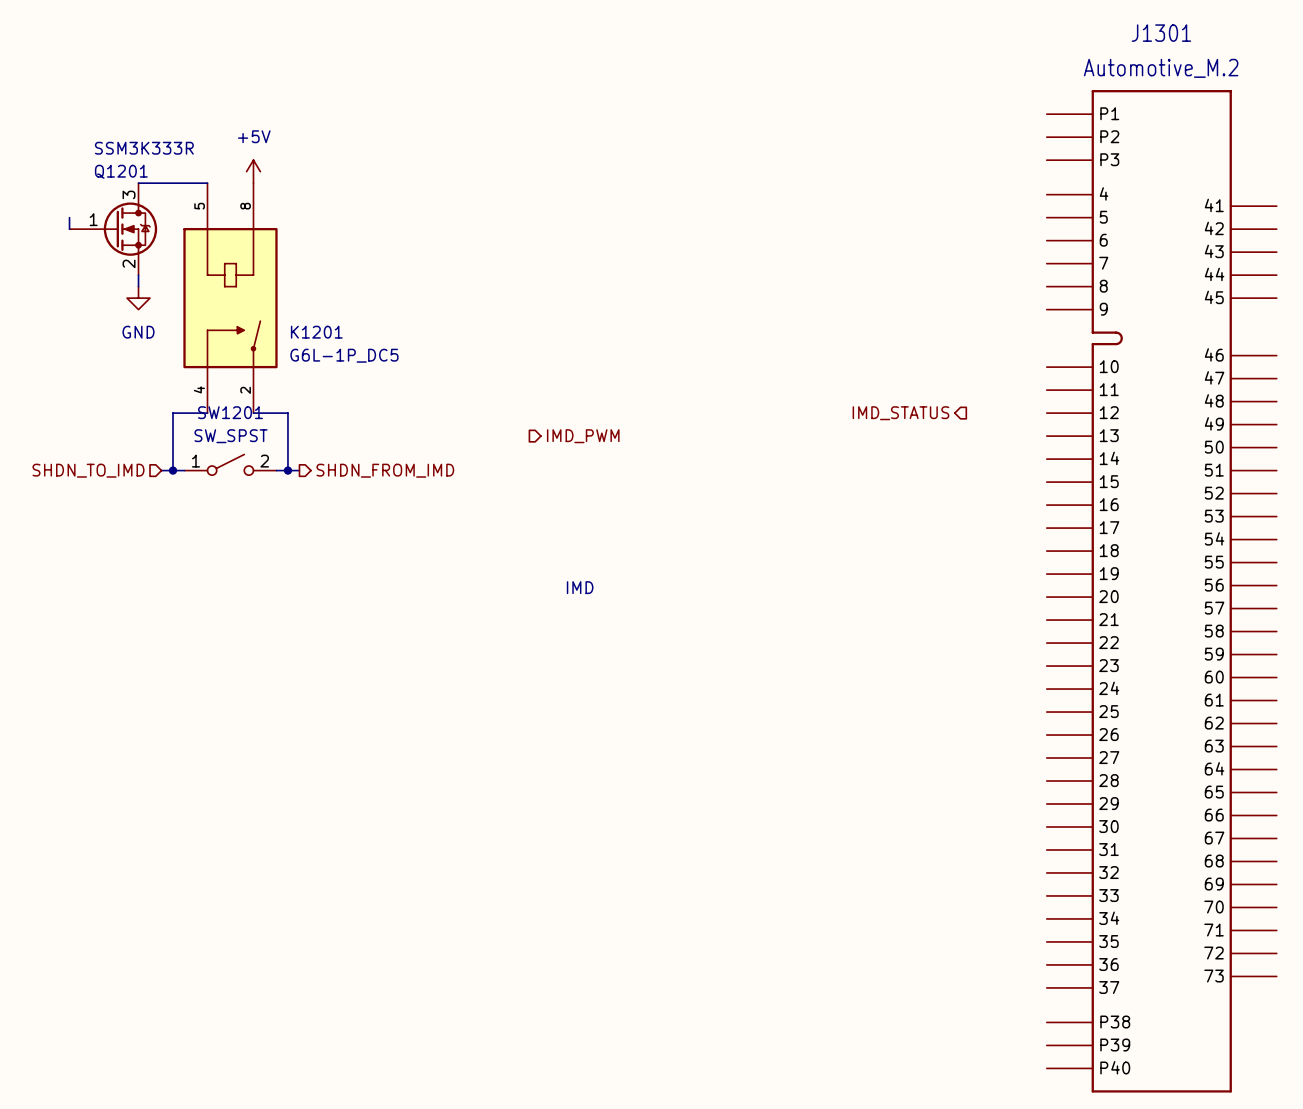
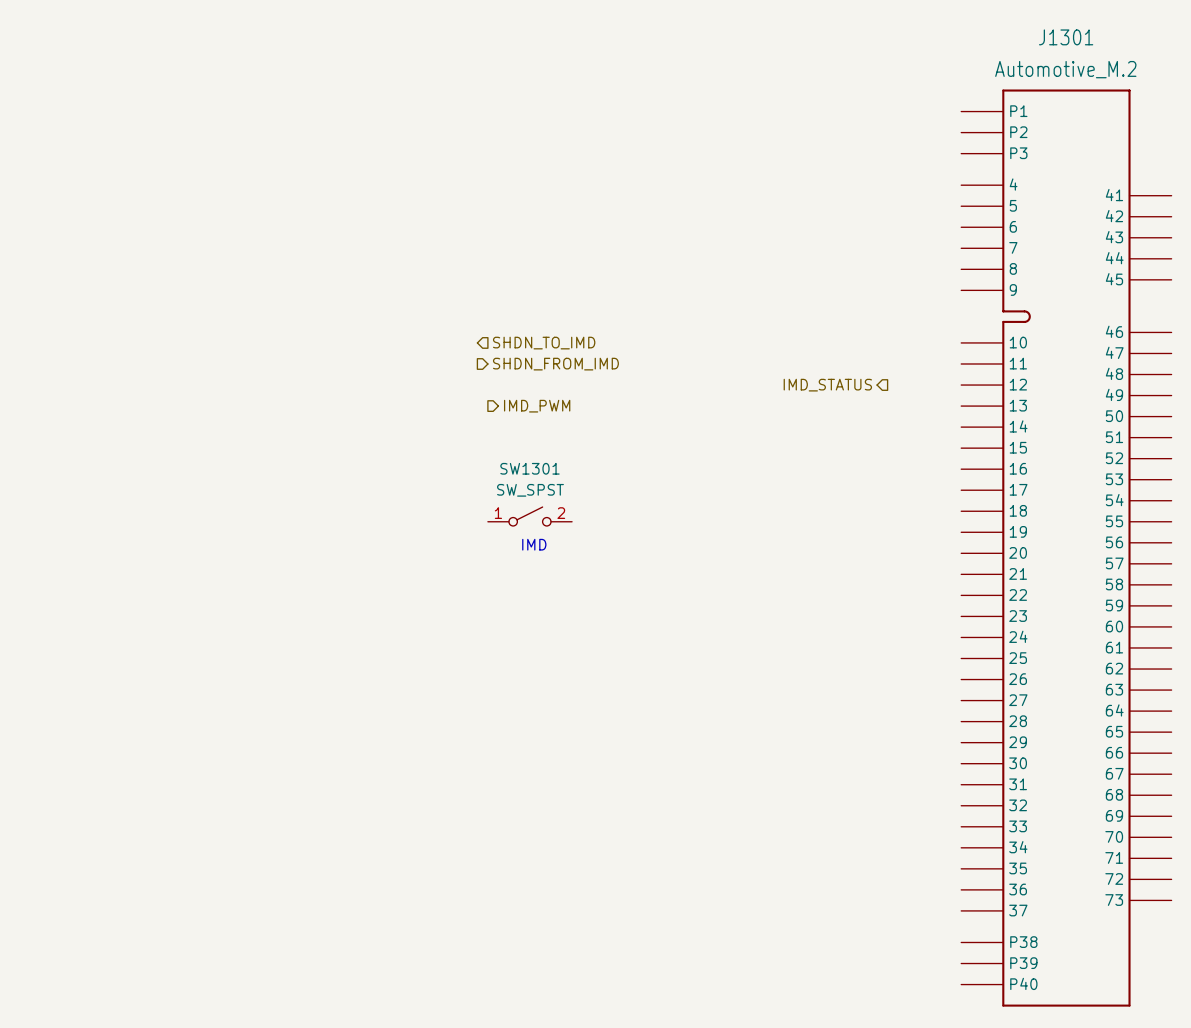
power symbol: +5V (253, 171) -> none
wire: (138, 183) (207, 183) -> none
wire: (69, 217) (69, 229) -> none
Q1201: SSM3K333R (113, 229) -> none
wire: (138, 275) (138, 286) -> none
power symbol: GND (138, 298) -> none
K1201: G6L-1P_DC5 (230, 298) -> none
hierarchical label: none -> SHDN_TO_IMD (544, 343)
hierarchical label: none -> SHDN_FROM_IMD (555, 364)
wire: (207, 413) (173, 413) (173, 470) -> none
wire: (253, 413) (287, 413) (287, 470) -> none
SW1201: SW_SPST (230, 464) -> none
hierarchical label: SHDN_TO_IMD (88, 470) -> none
wire: (161, 470) (184, 470) -> none
junction: (173, 470) -> none
wire: (276, 470) (299, 470) -> none
junction: (287, 470) -> none
hierarchical label: SHDN_FROM_IMD (385, 470) -> none
SW1301: none -> SW_SPST (529, 516)

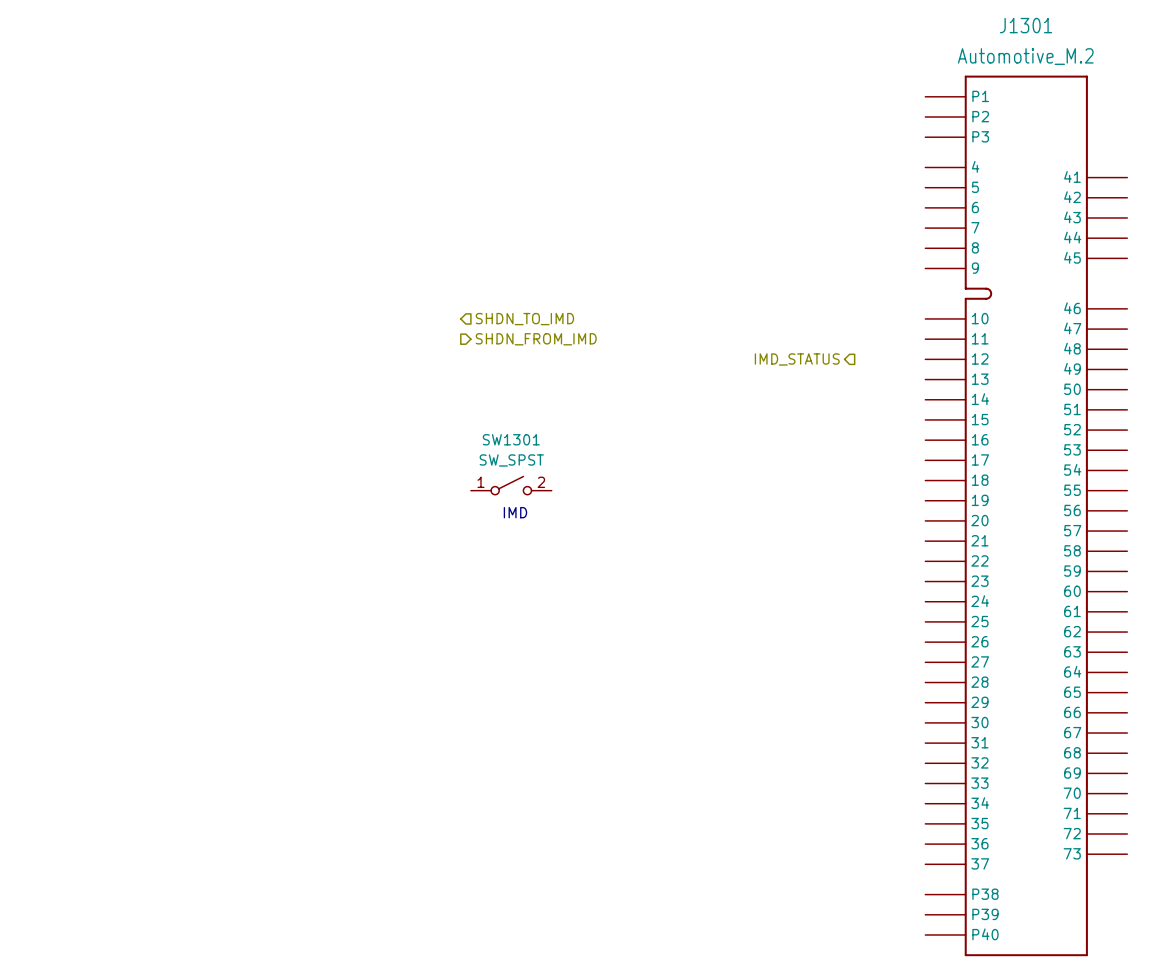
hierarchical label: IMD_PWM (537, 406) -> none

